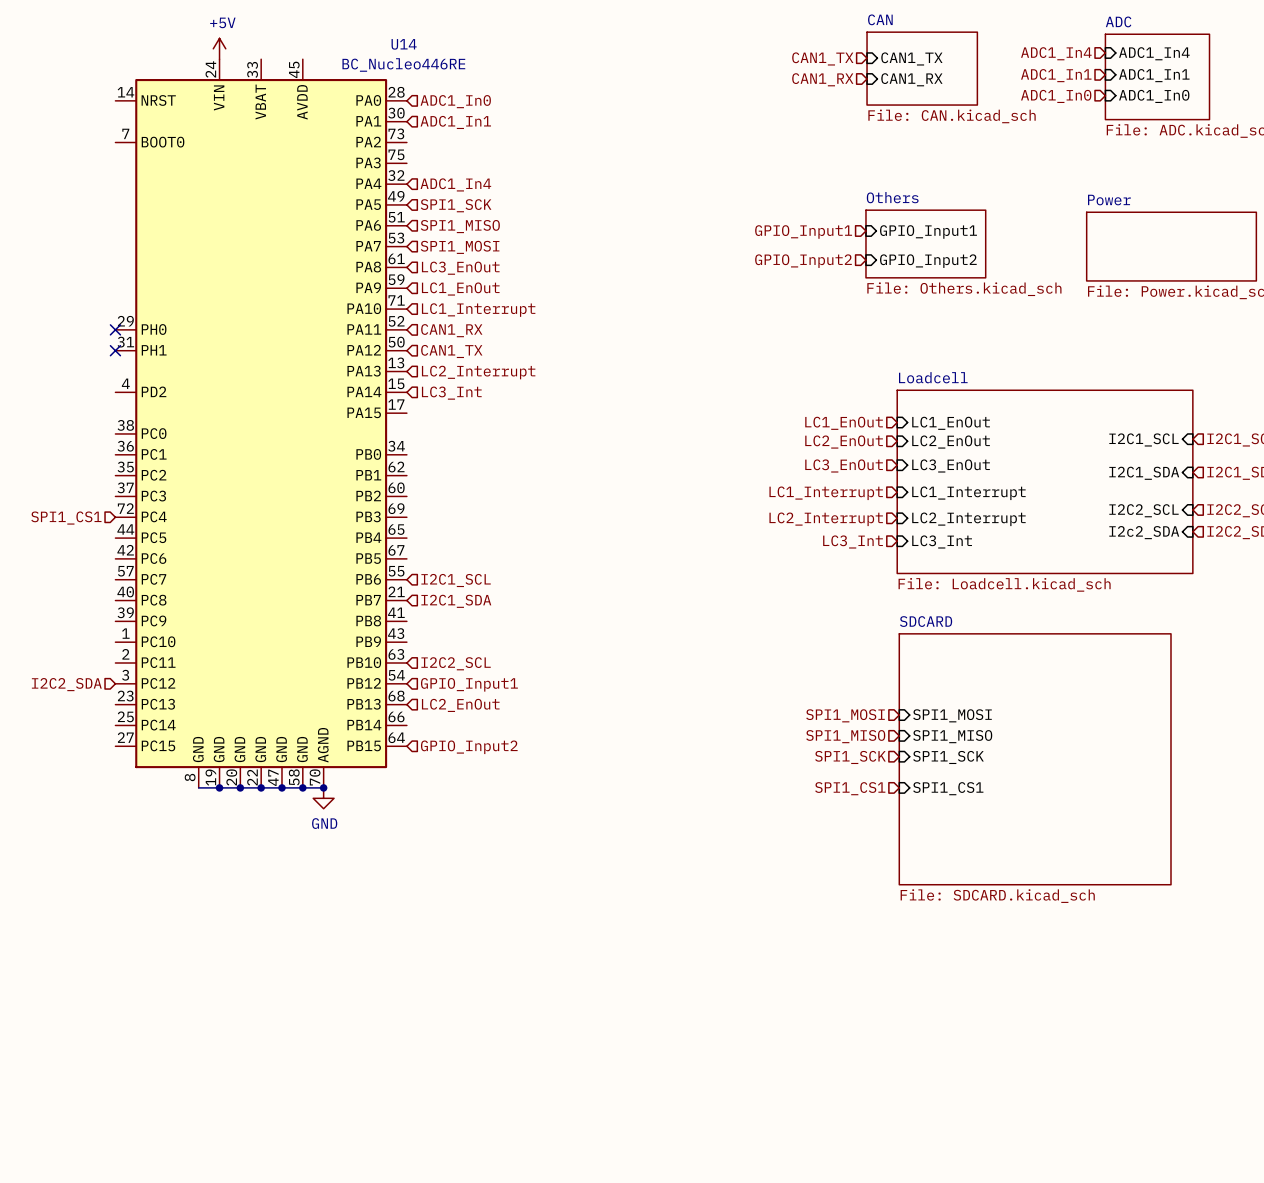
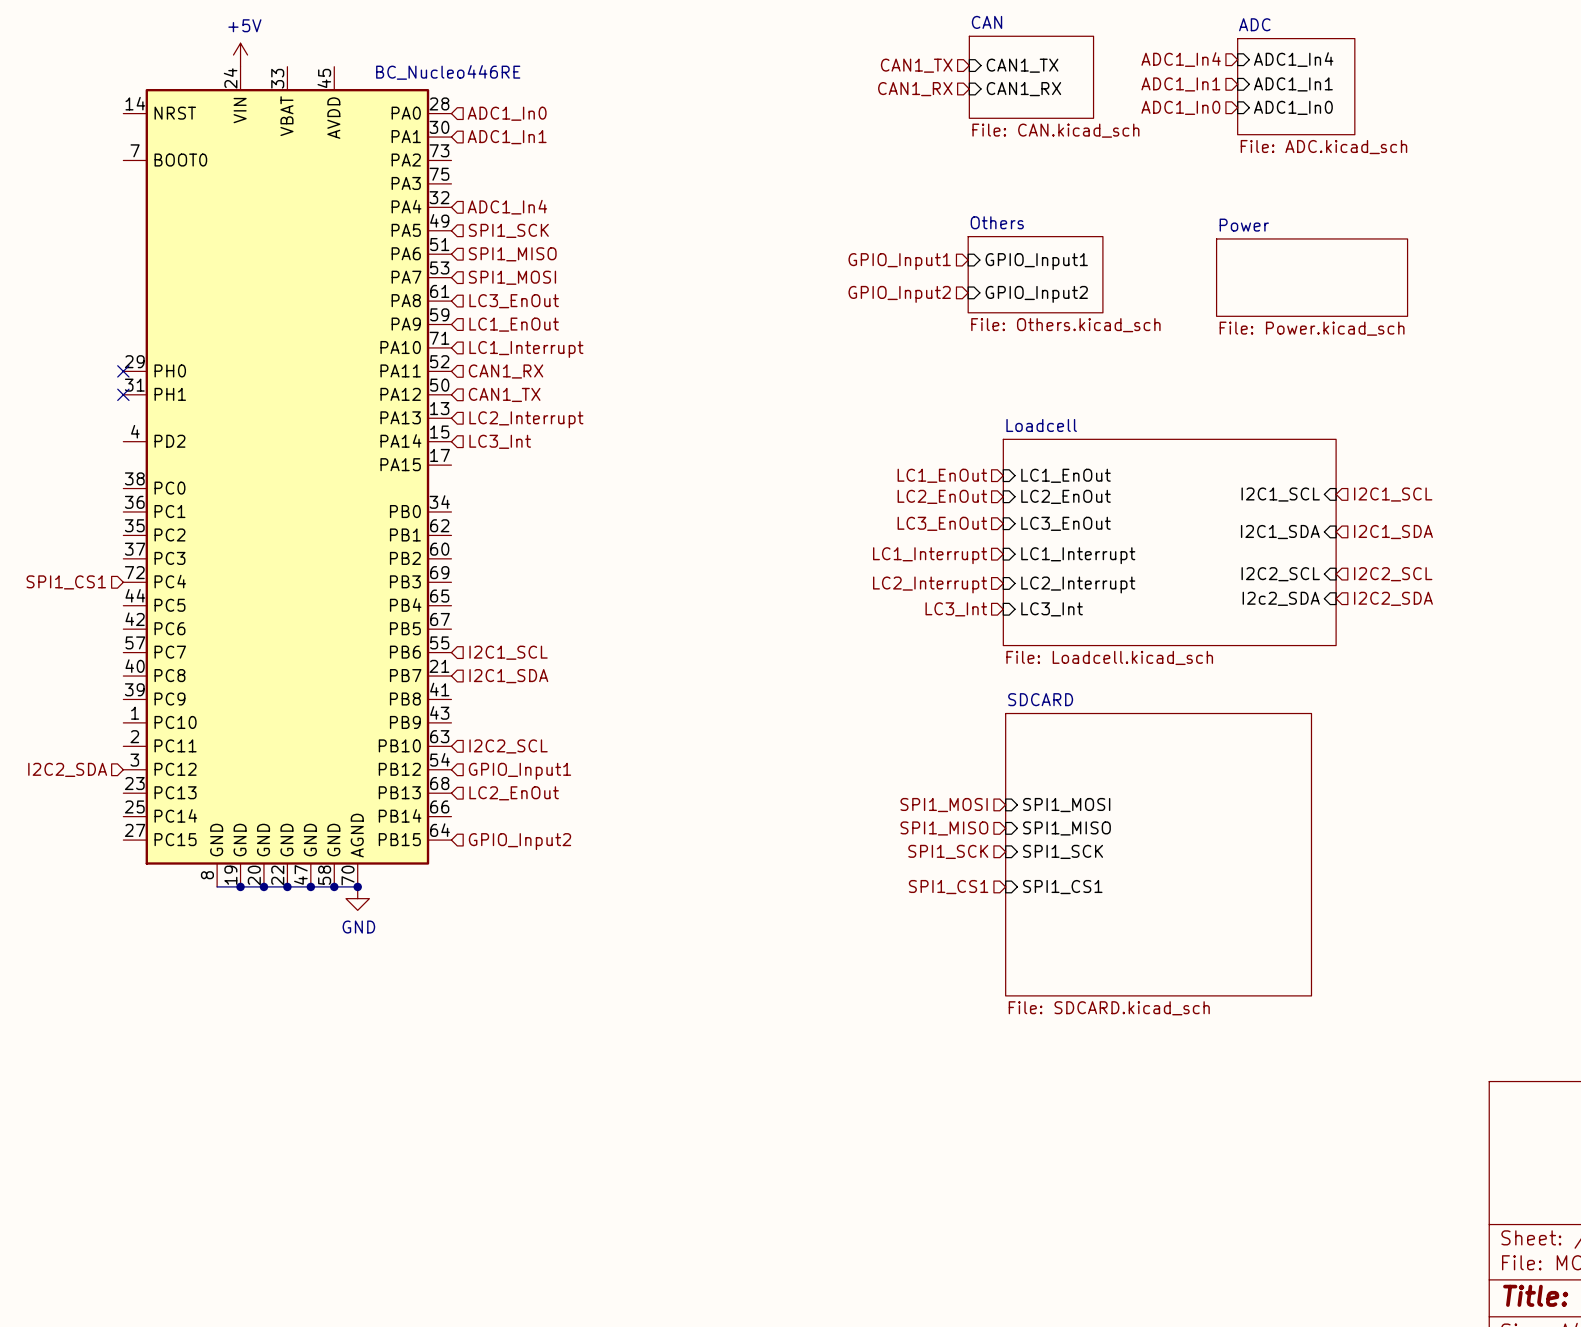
U14 name: U14 (404, 44) -> none

